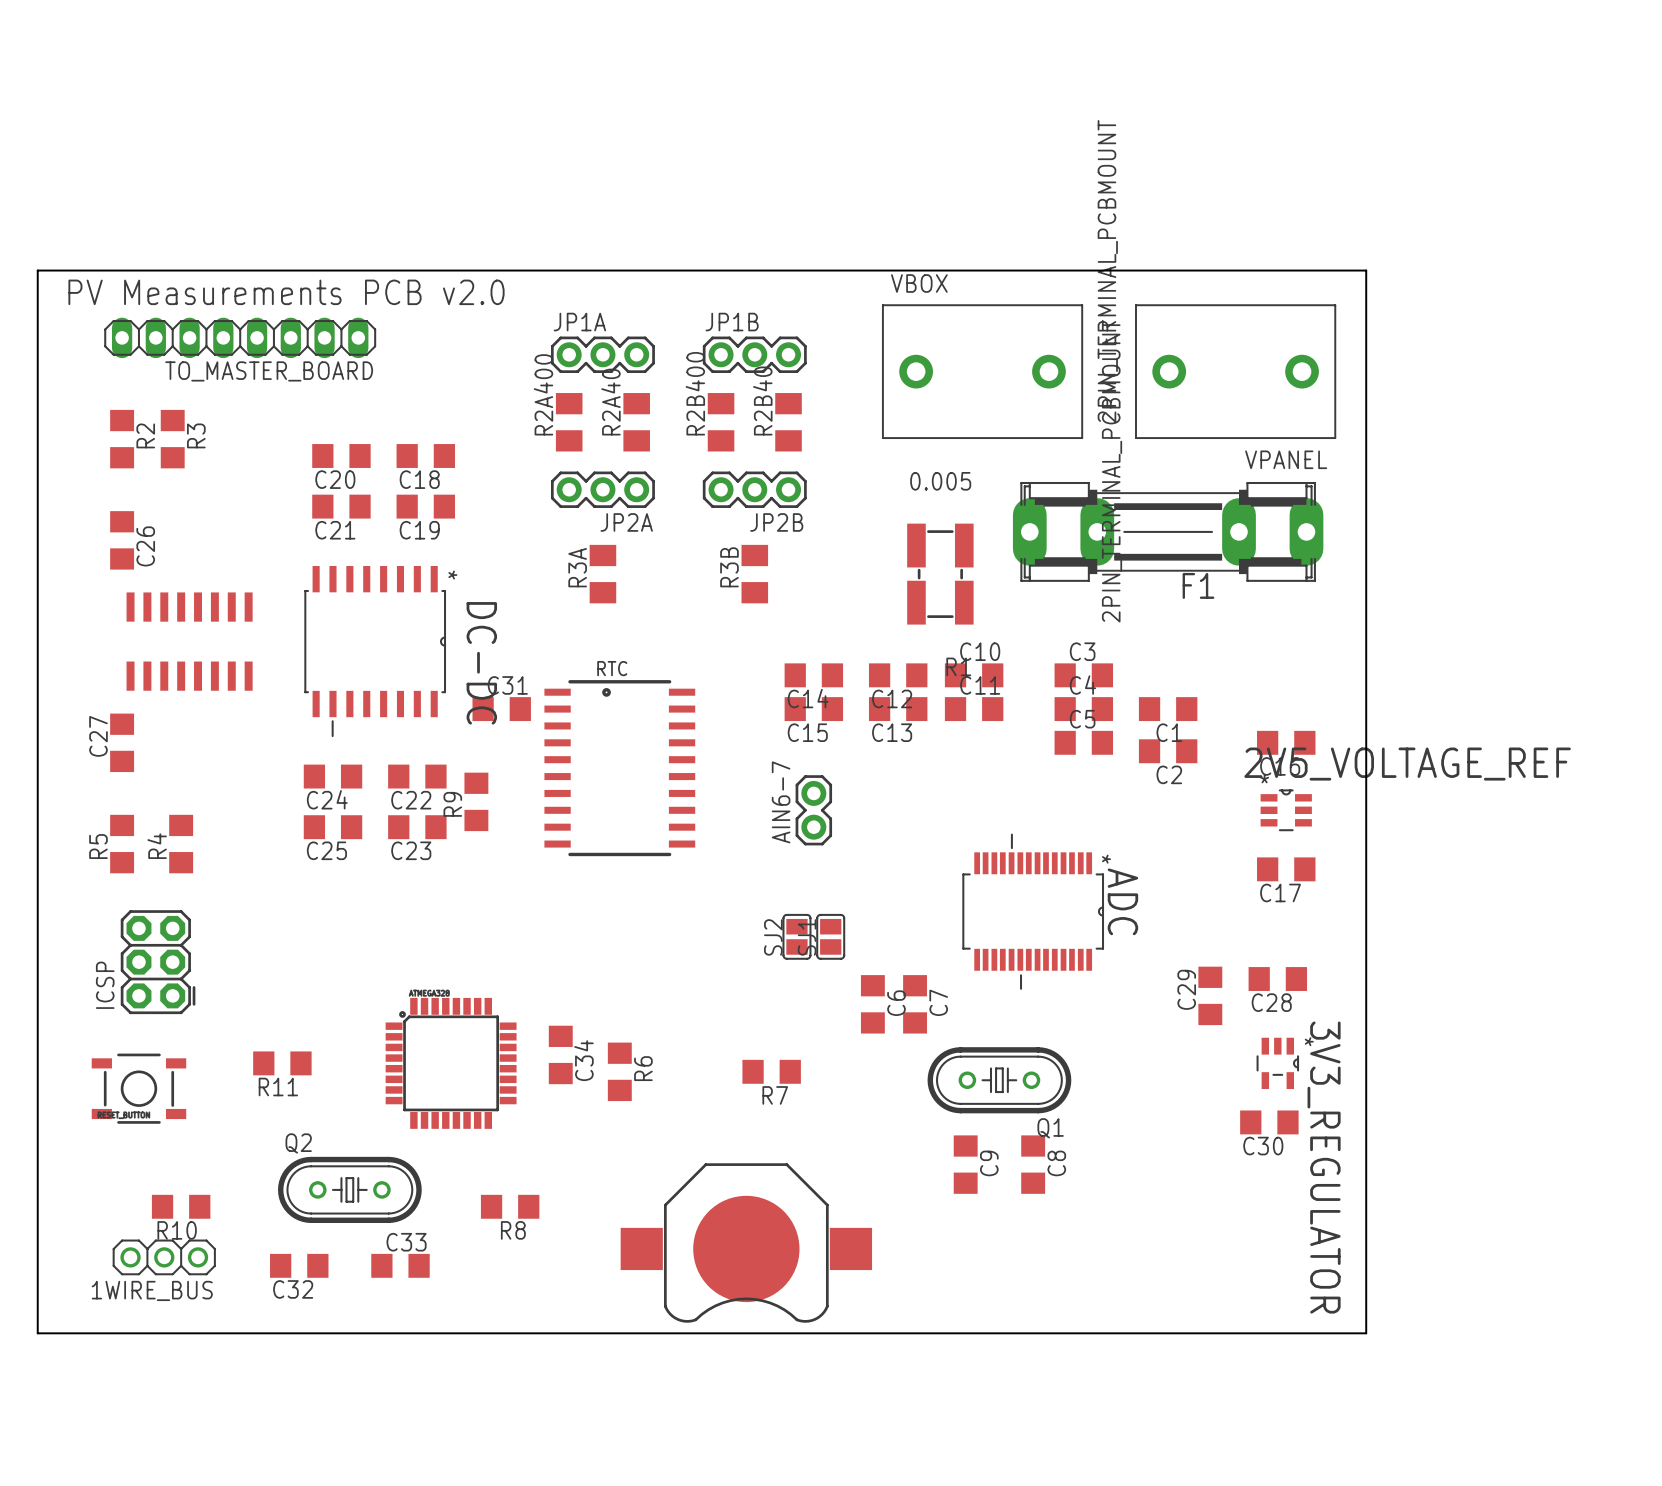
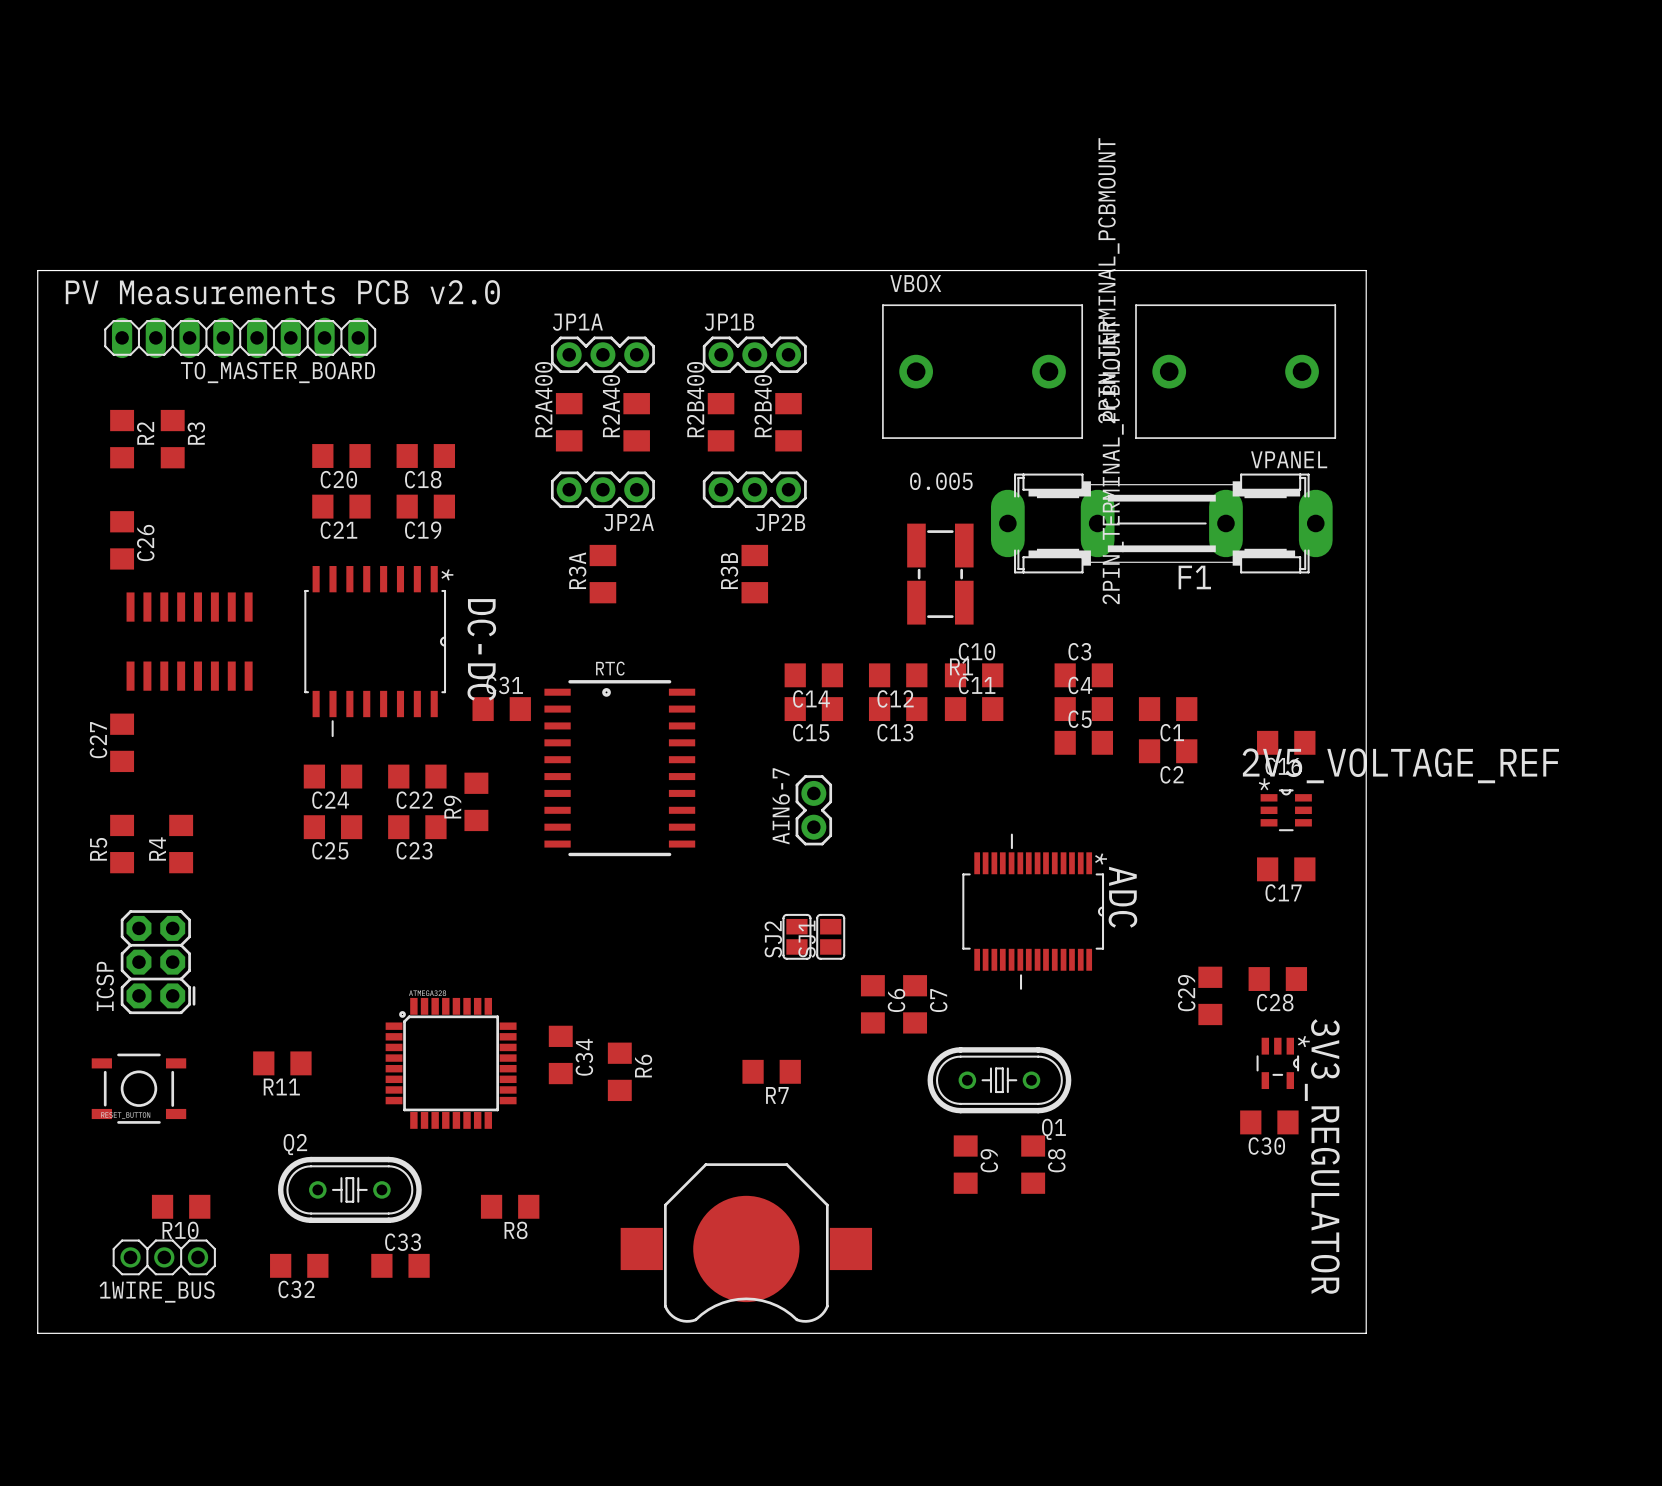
F1 footprint: [1012, 481, 1324, 582] -> [990, 473, 1333, 574]

